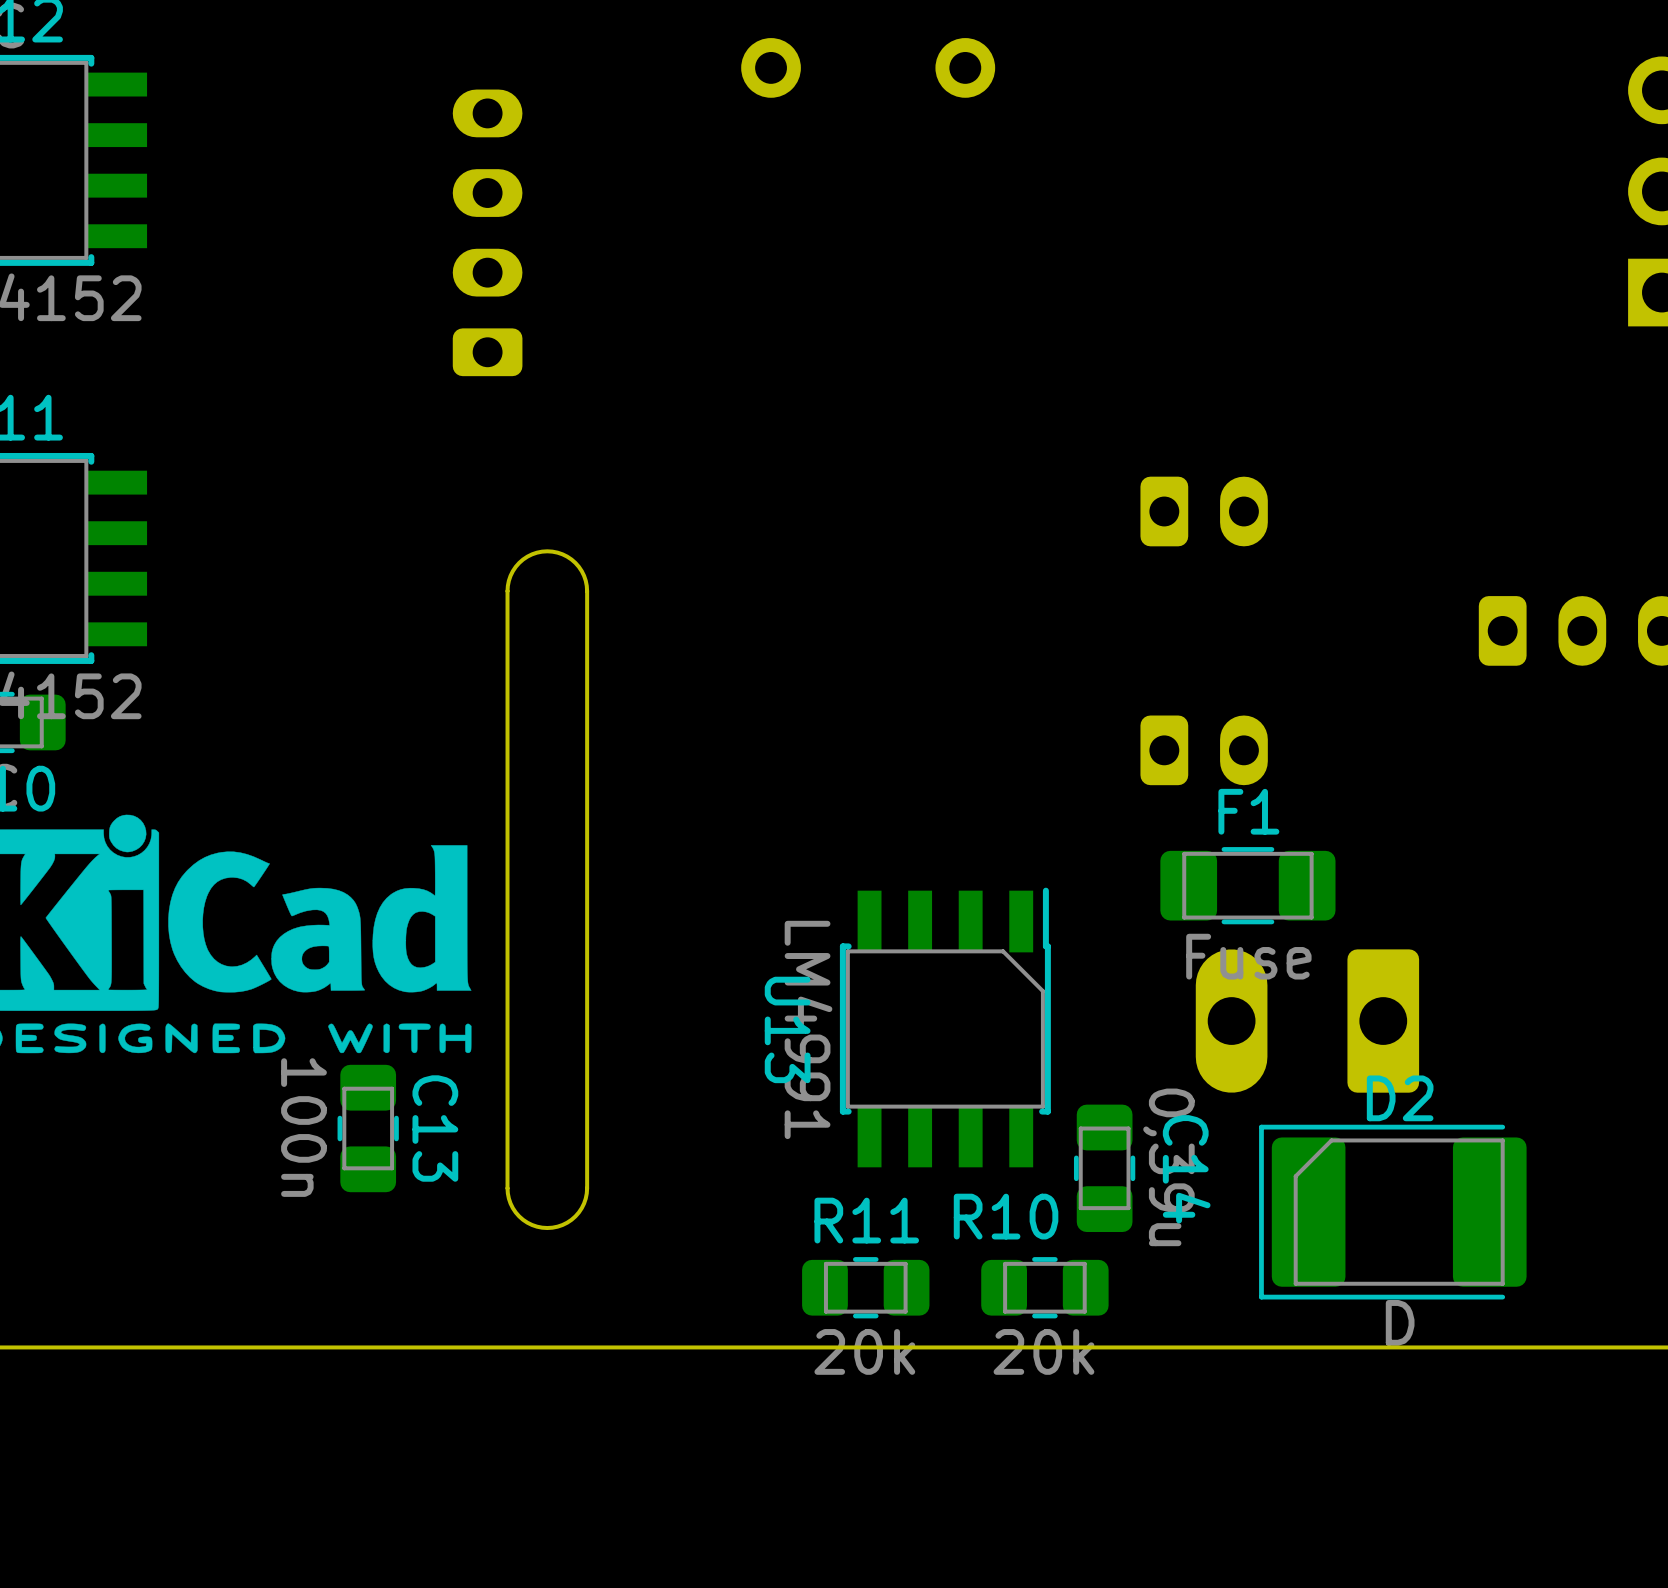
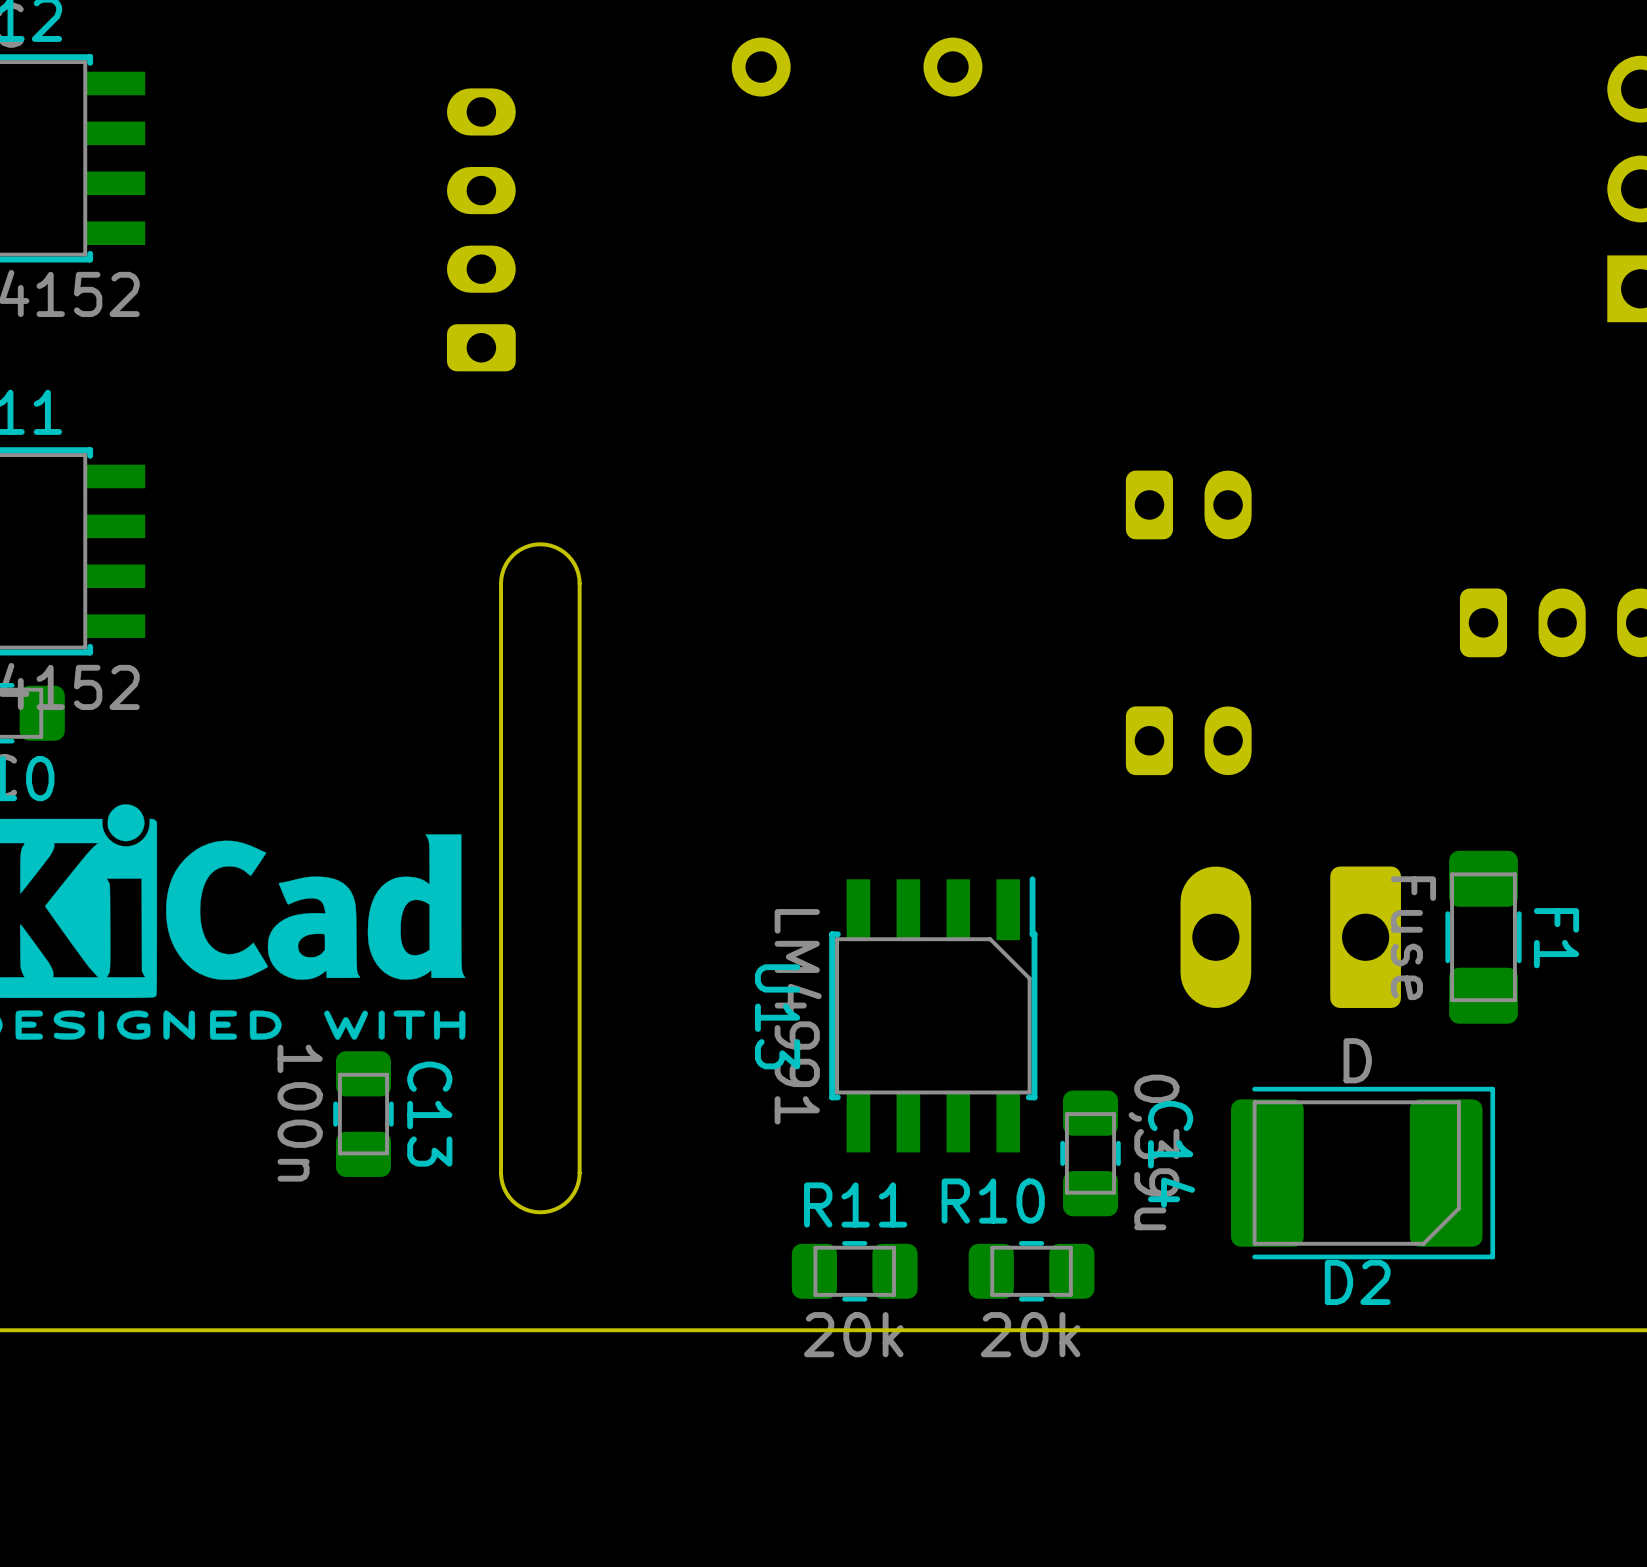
F1 rotation: 0° (1247, 885) -> 90° clockwise (1483, 937)
F1 position: (1247, 885) -> (1483, 937)
part position: (1307, 1021) -> (1290, 937)
D2 rotation: 0° (1392, 1212) -> 180° (1363, 1173)

